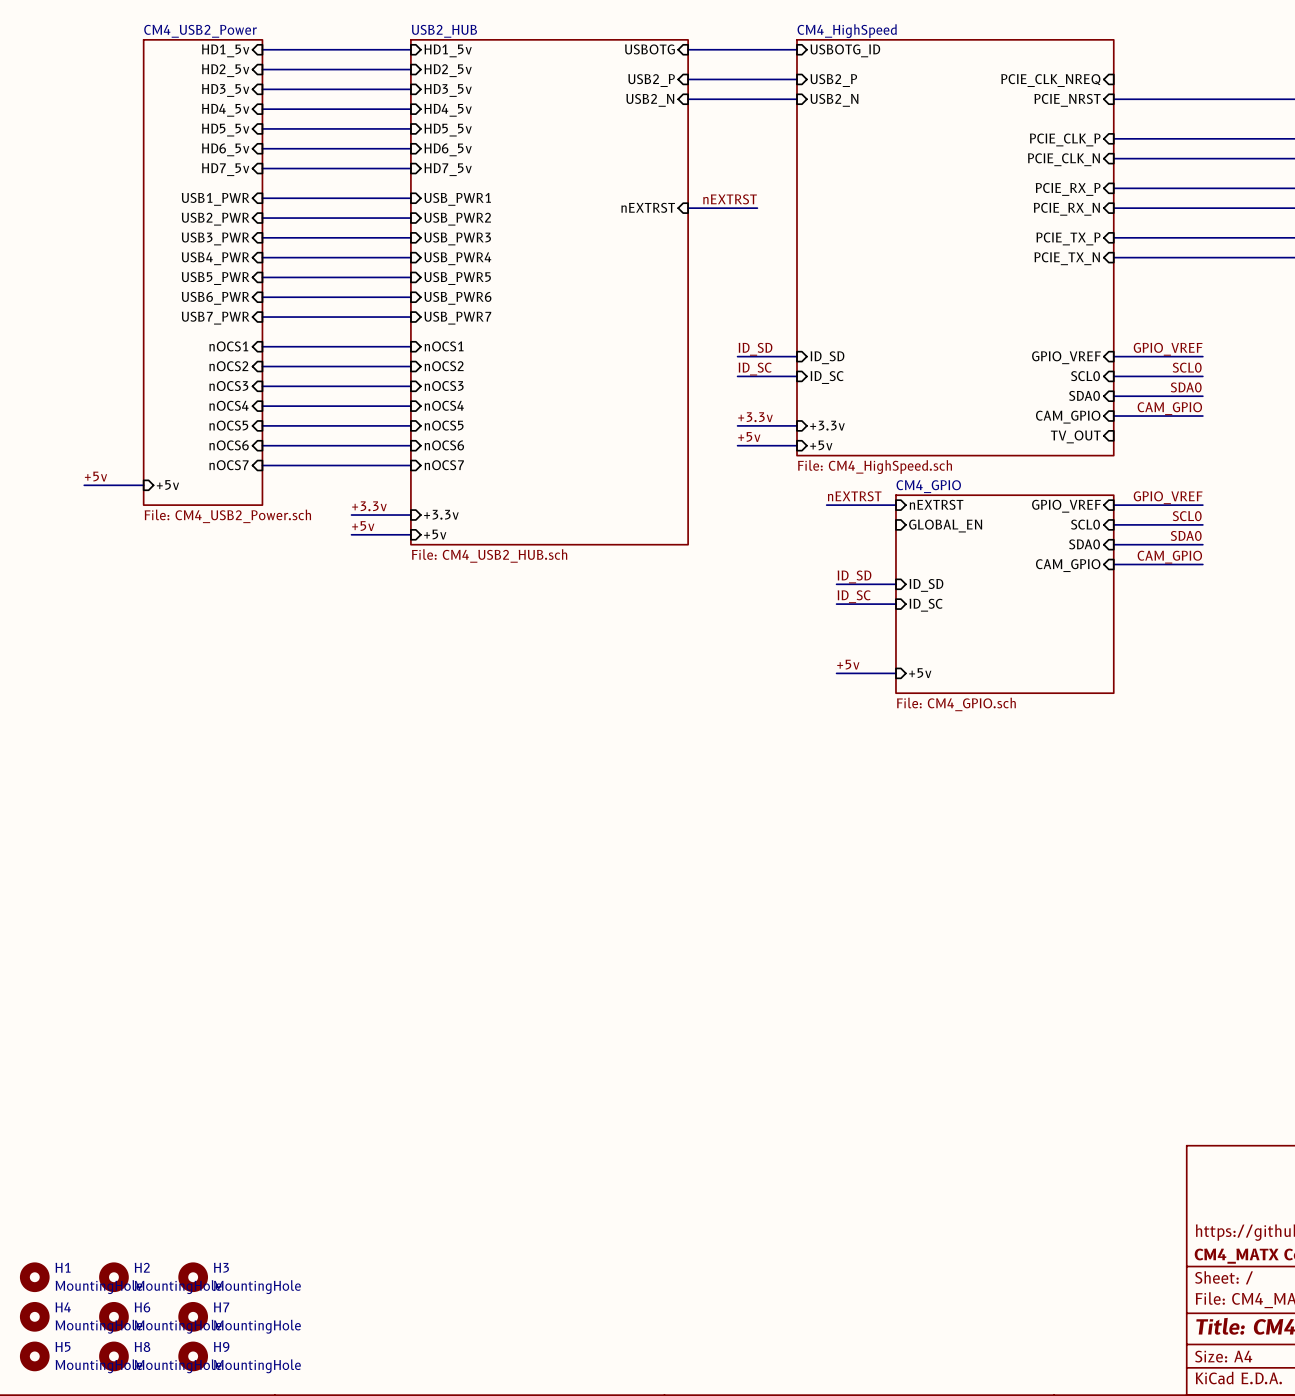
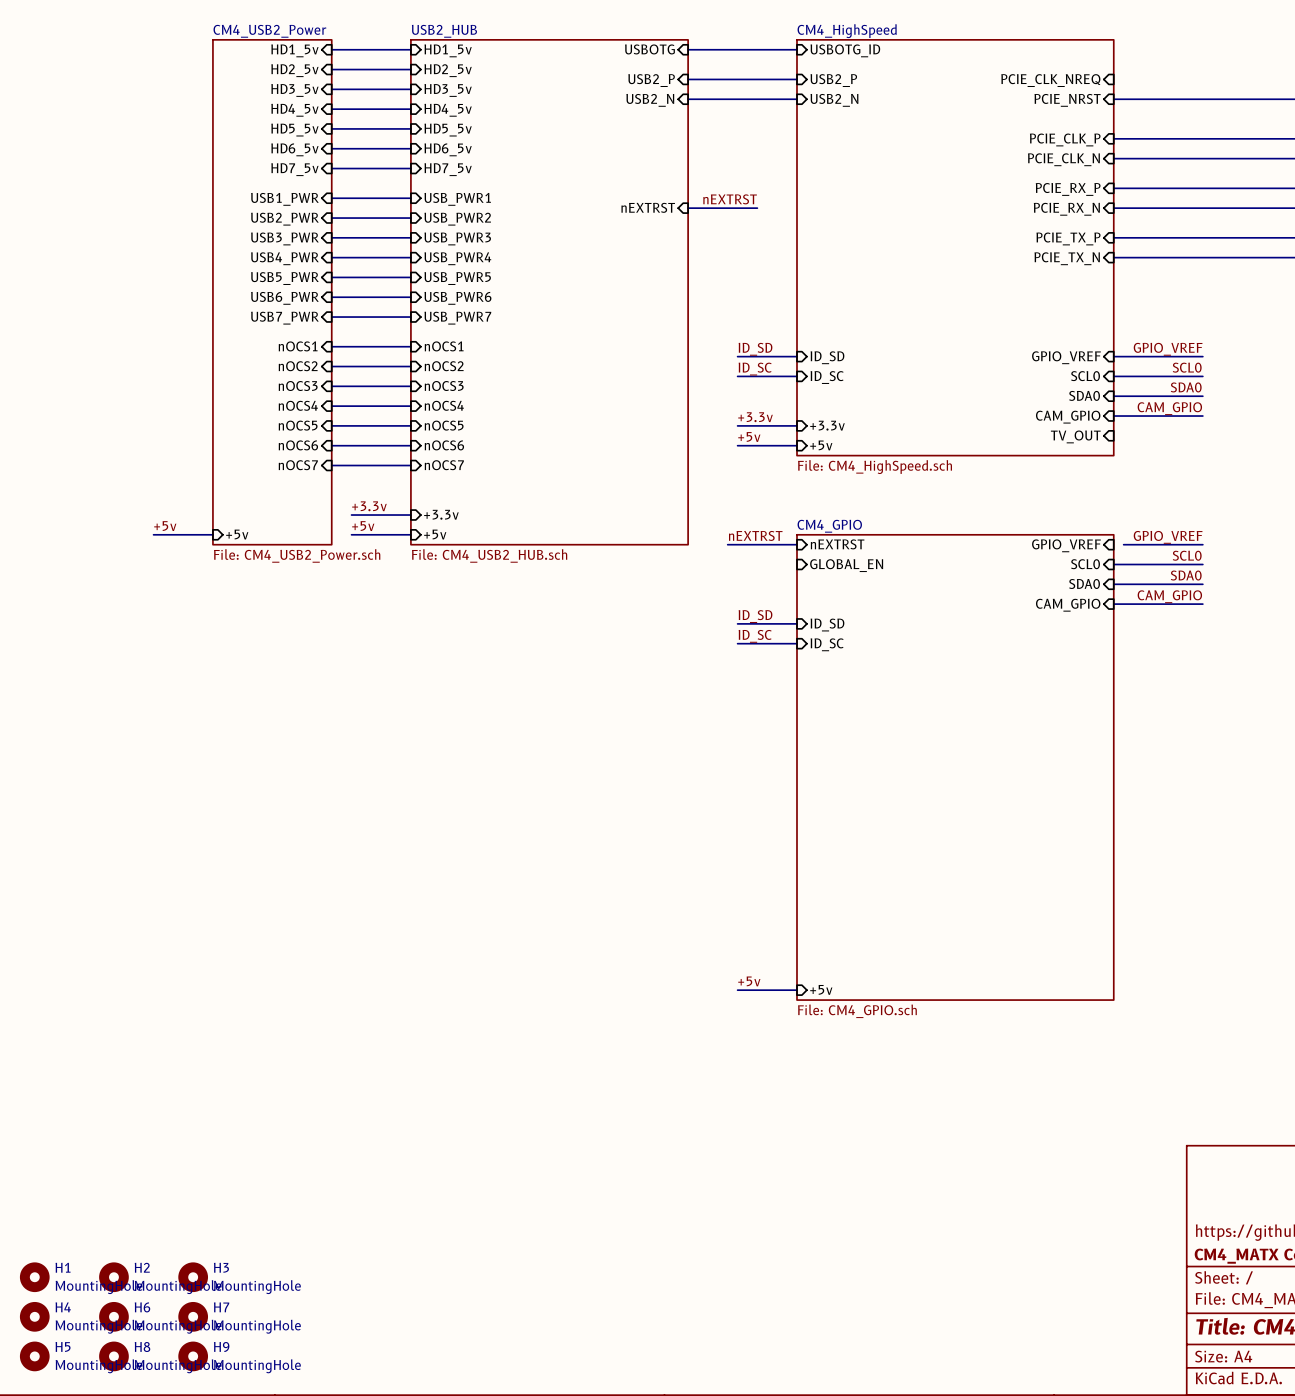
sheet CM4_USB2_Power name position: CM4_USB2_Power (200, 31) -> CM4_USB2_Power (269, 31)
sheet CM4_USB2_Power shape: [143, 39, 263, 506] -> [212, 39, 332, 545]
wire: (262, 49) (331, 49) -> none
sheet pin position: HD1_5v (225, 50) -> HD1_5v (294, 50)
wire: (262, 69) (331, 69) -> none
sheet pin position: HD2_5v (225, 70) -> HD2_5v (294, 70)
wire: (262, 89) (331, 89) -> none
sheet pin position: HD3_5v (225, 90) -> HD3_5v (294, 90)
wire: (262, 109) (331, 109) -> none
sheet pin position: HD4_5v (225, 110) -> HD4_5v (294, 110)
wire: (262, 128) (331, 128) -> none
sheet pin position: HD5_5v (225, 130) -> HD5_5v (294, 130)
wire: (262, 148) (331, 148) -> none
sheet pin position: HD6_5v (225, 149) -> HD6_5v (294, 149)
wire: (262, 168) (331, 168) -> none
sheet pin position: HD7_5v (225, 169) -> HD7_5v (294, 169)
wire: (262, 198) (331, 198) -> none
sheet pin position: USB1_PWR (215, 199) -> USB1_PWR (284, 199)
wire: (262, 218) (331, 218) -> none
sheet pin position: USB2_PWR (215, 219) -> USB2_PWR (284, 219)
wire: (262, 237) (331, 237) -> none
sheet pin position: USB3_PWR (215, 238) -> USB3_PWR (284, 238)
wire: (262, 257) (331, 257) -> none
sheet pin position: USB4_PWR (215, 258) -> USB4_PWR (284, 258)
wire: (262, 277) (331, 277) -> none
sheet pin position: USB5_PWR (215, 278) -> USB5_PWR (284, 278)
wire: (262, 297) (331, 297) -> none
sheet pin position: USB6_PWR (215, 298) -> USB6_PWR (284, 298)
wire: (262, 317) (331, 317) -> none
sheet pin position: USB7_PWR (215, 318) -> USB7_PWR (284, 318)
sheet pin position: nOCS1 (228, 346) -> nOCS1 (298, 346)
wire: (262, 346) (331, 346) -> none
sheet pin position: nOCS2 (228, 366) -> nOCS2 (298, 366)
wire: (262, 366) (331, 366) -> none
sheet pin position: nOCS3 (228, 386) -> nOCS3 (298, 386)
wire: (262, 386) (331, 386) -> none
sheet pin position: nOCS4 (229, 405) -> nOCS4 (298, 405)
wire: (262, 406) (331, 406) -> none
sheet pin position: nOCS5 (228, 425) -> nOCS5 (298, 425)
wire: (262, 425) (331, 425) -> none
sheet pin position: nOCS6 (229, 445) -> nOCS6 (298, 445)
wire: (262, 445) (331, 445) -> none
sheet pin position: nOCS7 (229, 465) -> nOCS7 (298, 465)
wire: (262, 465) (331, 465) -> none
label position: +5v (96, 476) -> +5v (165, 526)
wire: (84, 485) (143, 485) -> (153, 534) (212, 534)
sheet pin position: +5v (167, 485) -> +5v (237, 534)
sheet CM4_GPIO name position: CM4_GPIO (928, 486) -> CM4_GPIO (829, 526)
sheet CM4_GPIO shape: [895, 495, 1114, 694] -> [796, 534, 1114, 1001]
label position: nEXTRST (854, 496) -> nEXTRST (755, 535)
label: GPIO_VREF (1168, 497) -> none
sheet pin position: nEXTRST (936, 504) -> nEXTRST (837, 544)
wire: (826, 505) (895, 505) -> (727, 544) (796, 544)
wire: (1113, 505) (1202, 505) -> (1113, 584) (1202, 584)
sheet pin: GPIO_VREF (1066, 506) -> none
sheet CM4_USB2_Power value position: File: CM4_USB2_Power.sch (227, 516) -> File: CM4_USB2_Power.sch (297, 555)
label: SCL0 (1187, 516) -> none
sheet pin: SCL0 (1085, 524) -> none
wire: (1113, 524) (1202, 524) -> (1113, 604) (1202, 604)
sheet pin position: GLOBAL_EN (945, 526) -> GLOBAL_EN (846, 565)
label: SDA0 (1186, 535) -> GPIO_VREF (1168, 537)
sheet pin: SDA0 (1084, 544) -> GPIO_VREF (1066, 545)
wire: (1113, 544) (1123, 544) -> none
label: CAM_GPIO (1169, 557) -> SCL0 (1187, 555)
sheet pin: CAM_GPIO (1068, 565) -> SCL0 (1085, 564)
label: none -> SDA0 (1186, 575)
label position: ID_SD (854, 576) -> ID_SD (755, 616)
sheet pin: none -> SDA0 (1084, 583)
wire: (836, 584) (895, 584) -> (737, 623) (796, 623)
sheet pin position: ID_SD (926, 585) -> ID_SD (827, 625)
label position: ID_SC (854, 596) -> ID_SC (755, 636)
label: none -> CAM_GPIO (1169, 596)
wire: (836, 604) (895, 604) -> (737, 643) (796, 643)
sheet pin position: ID_SC (926, 605) -> ID_SC (827, 644)
sheet pin: none -> CAM_GPIO (1068, 605)
label: +5v (848, 664) -> none
wire: (836, 673) (895, 673) -> none
sheet pin: +5v (920, 673) -> none
sheet CM4_GPIO value position: File: CM4_GPIO.sch (956, 704) -> File: CM4_GPIO.sch (857, 1011)
label: none -> +5v (749, 981)
sheet pin: none -> +5v (821, 989)
wire: none -> (737, 990) (796, 990)

